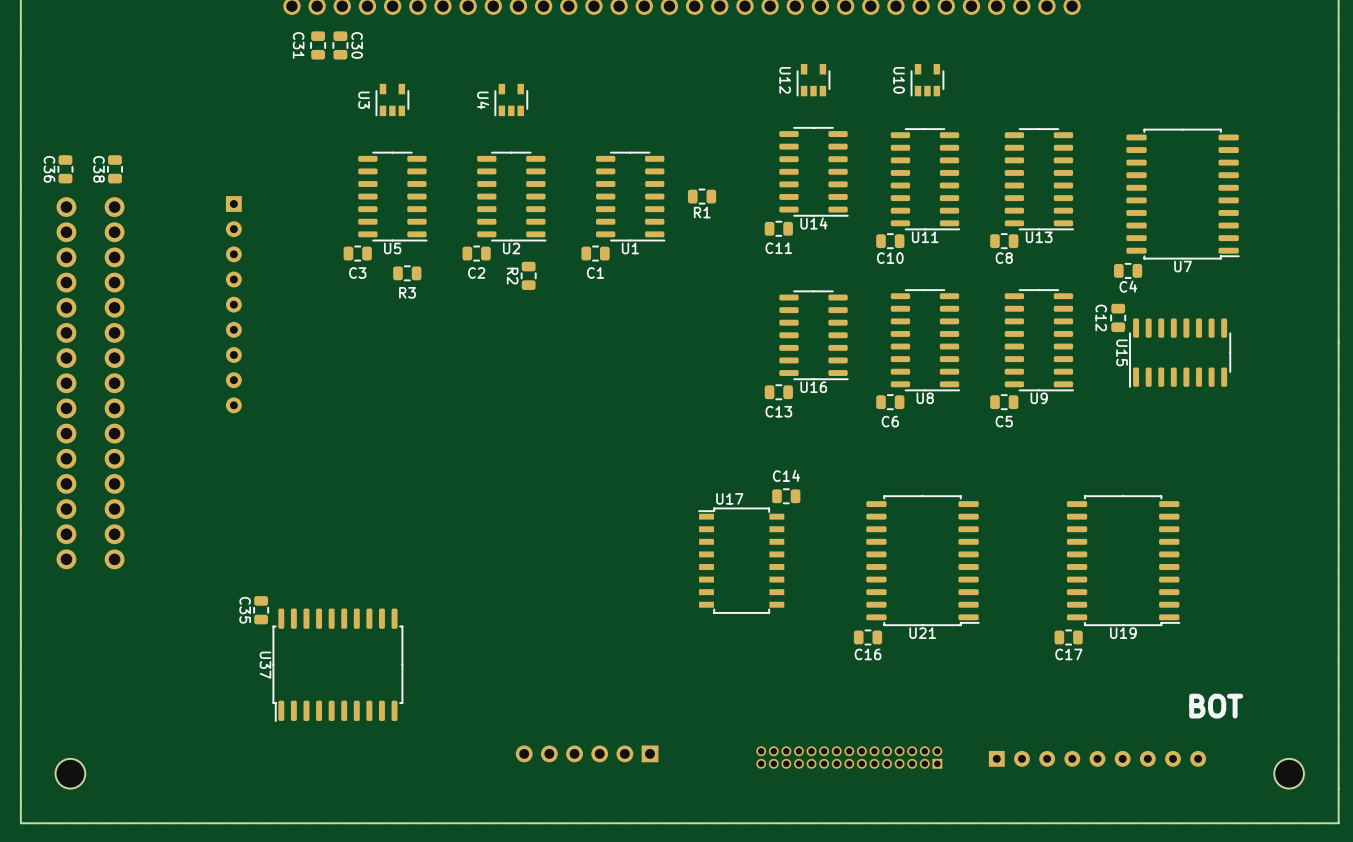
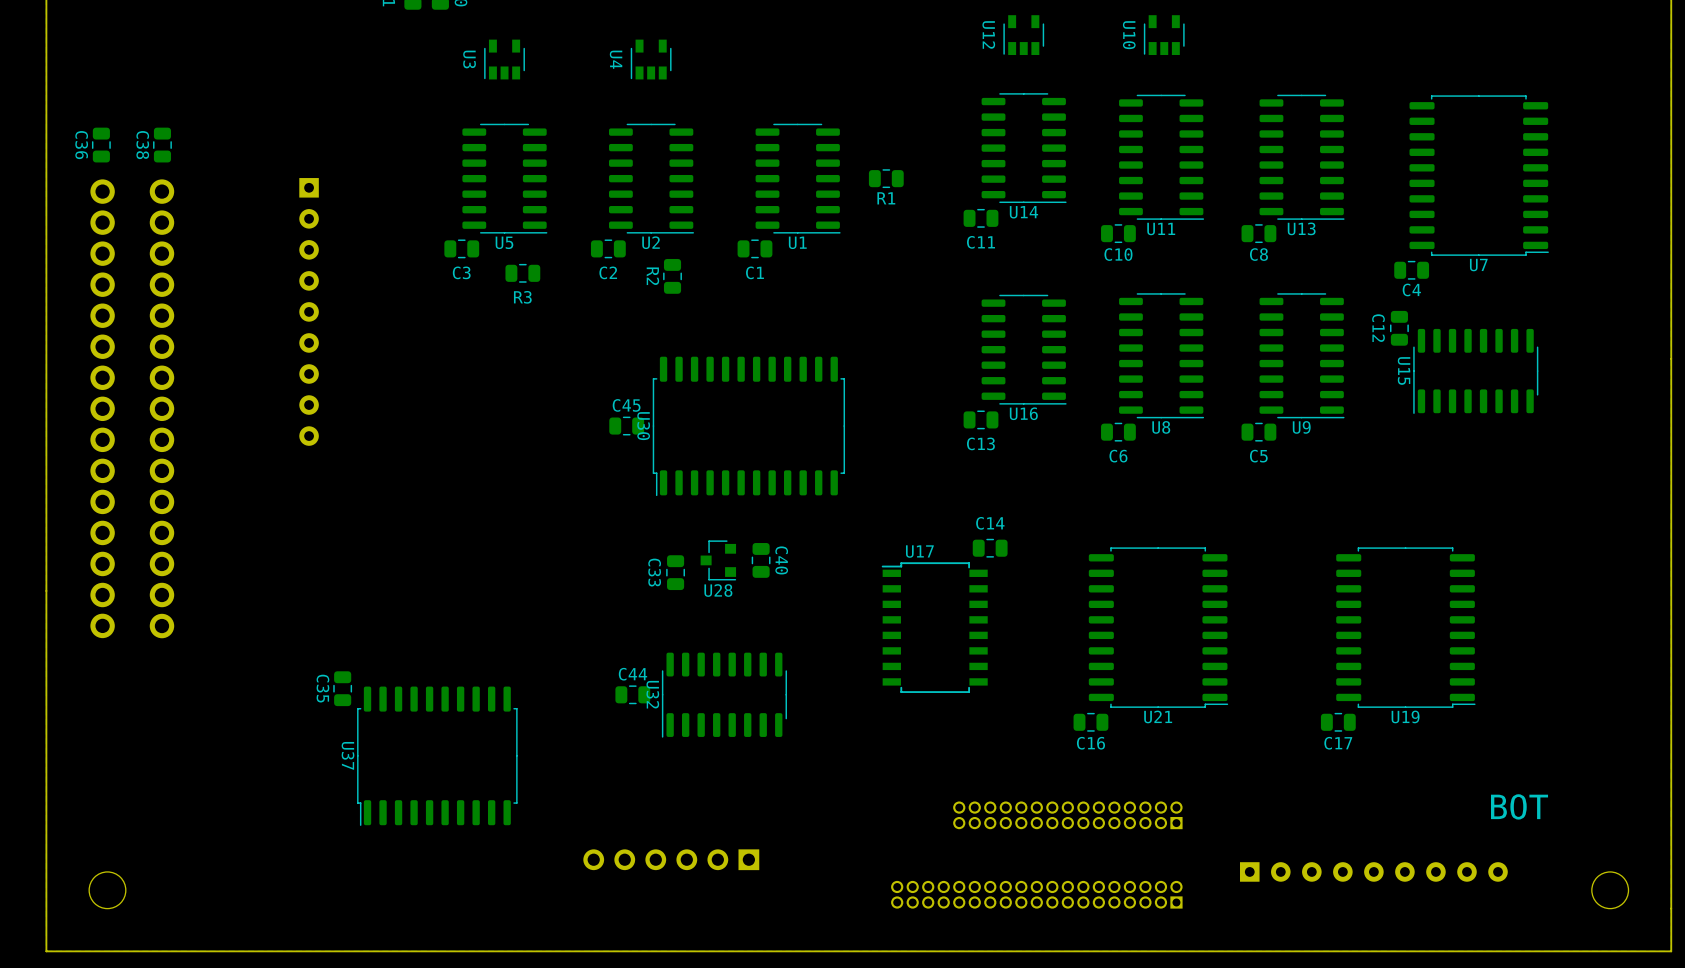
C45: none -> (626, 426)
U30: none -> (748, 426)
U28: none -> (718, 560)
C40: none -> (761, 560)
C33: none -> (675, 572)
C44: none -> (632, 694)
U32: none -> (724, 695)
part position: (587, 753) -> (671, 859)
part position: (849, 757) -> (1067, 815)
part: none -> (1036, 894)

